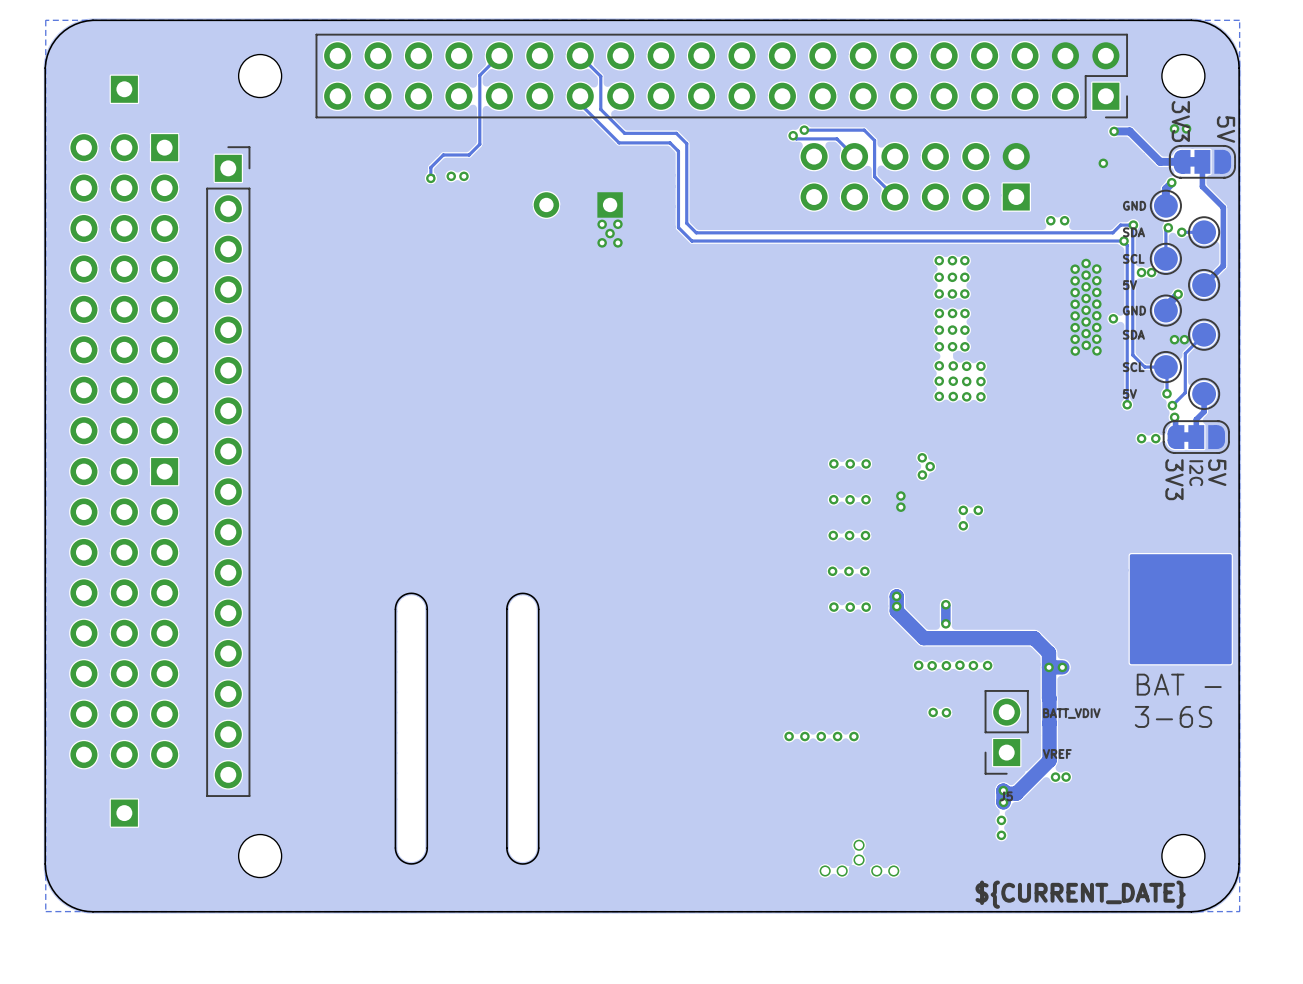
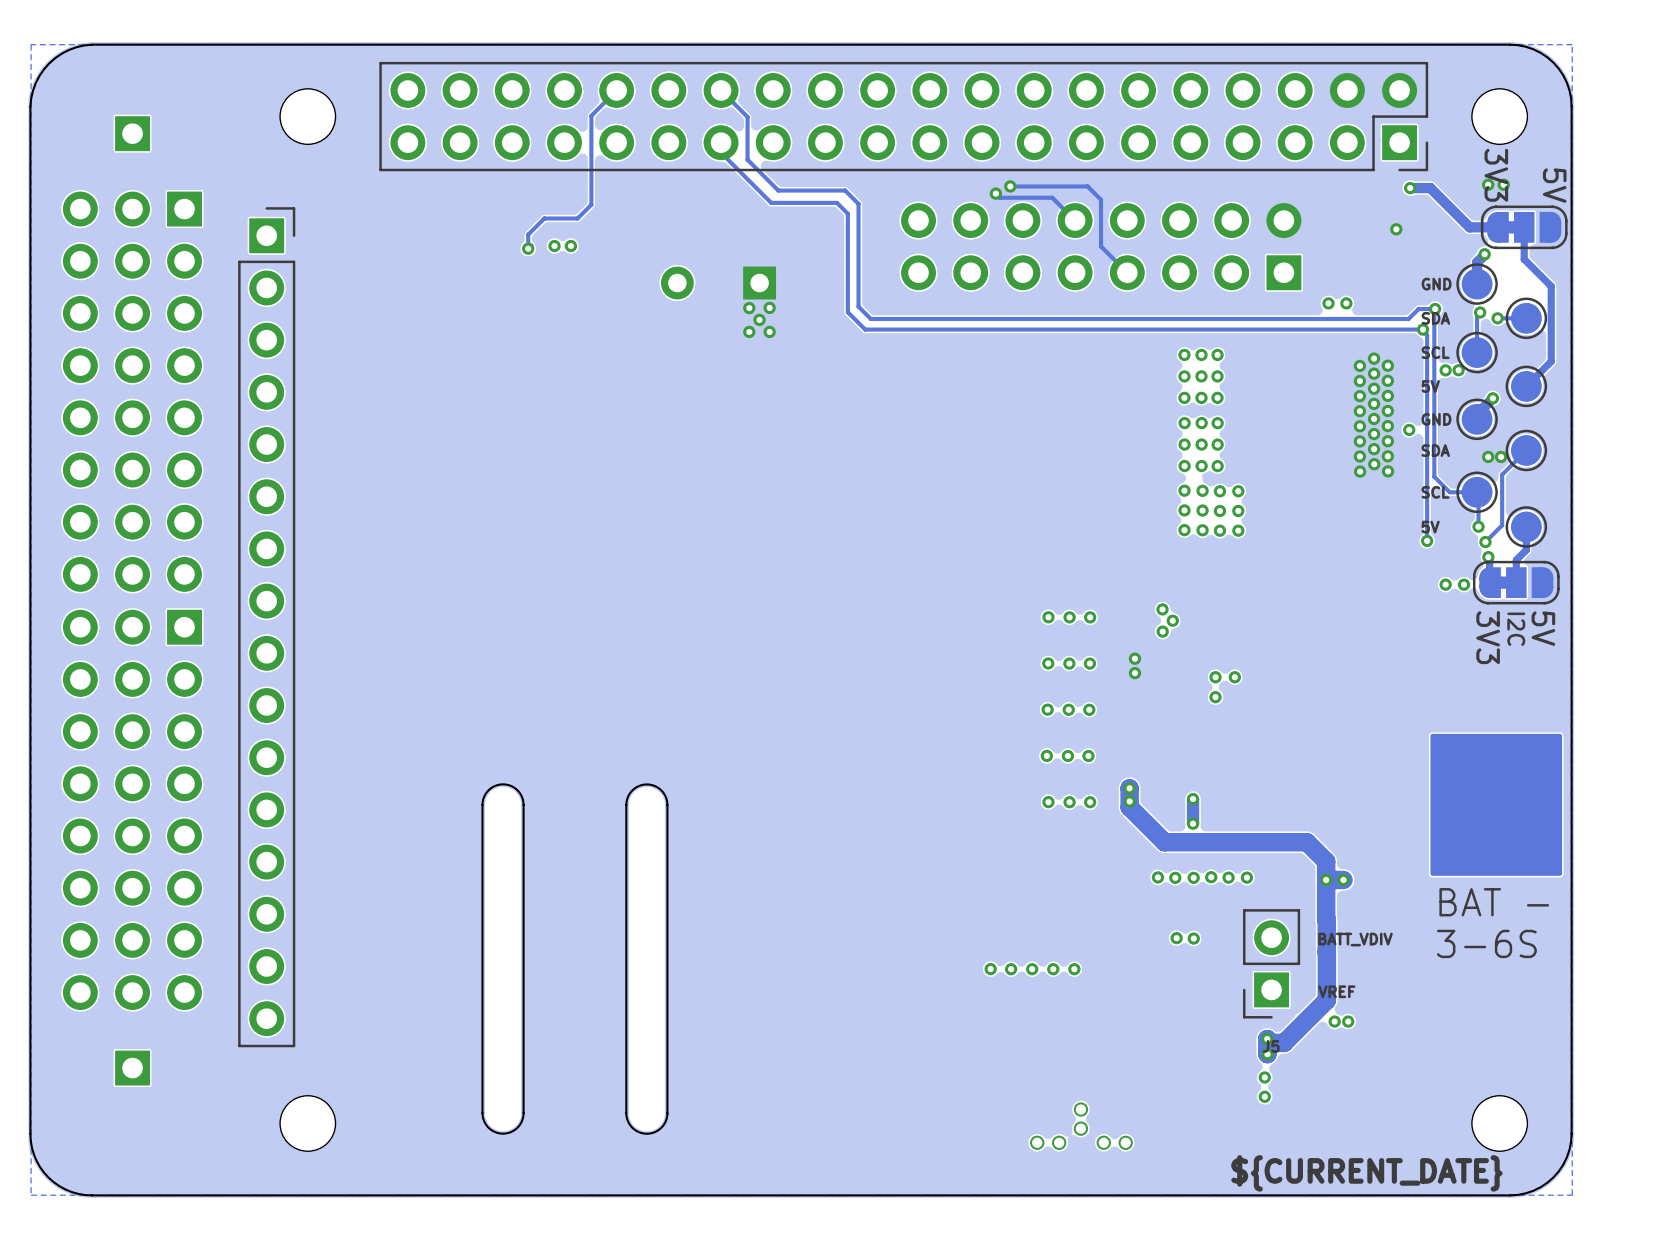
part: none -> (1101, 246)
part: (915, 176) -> none

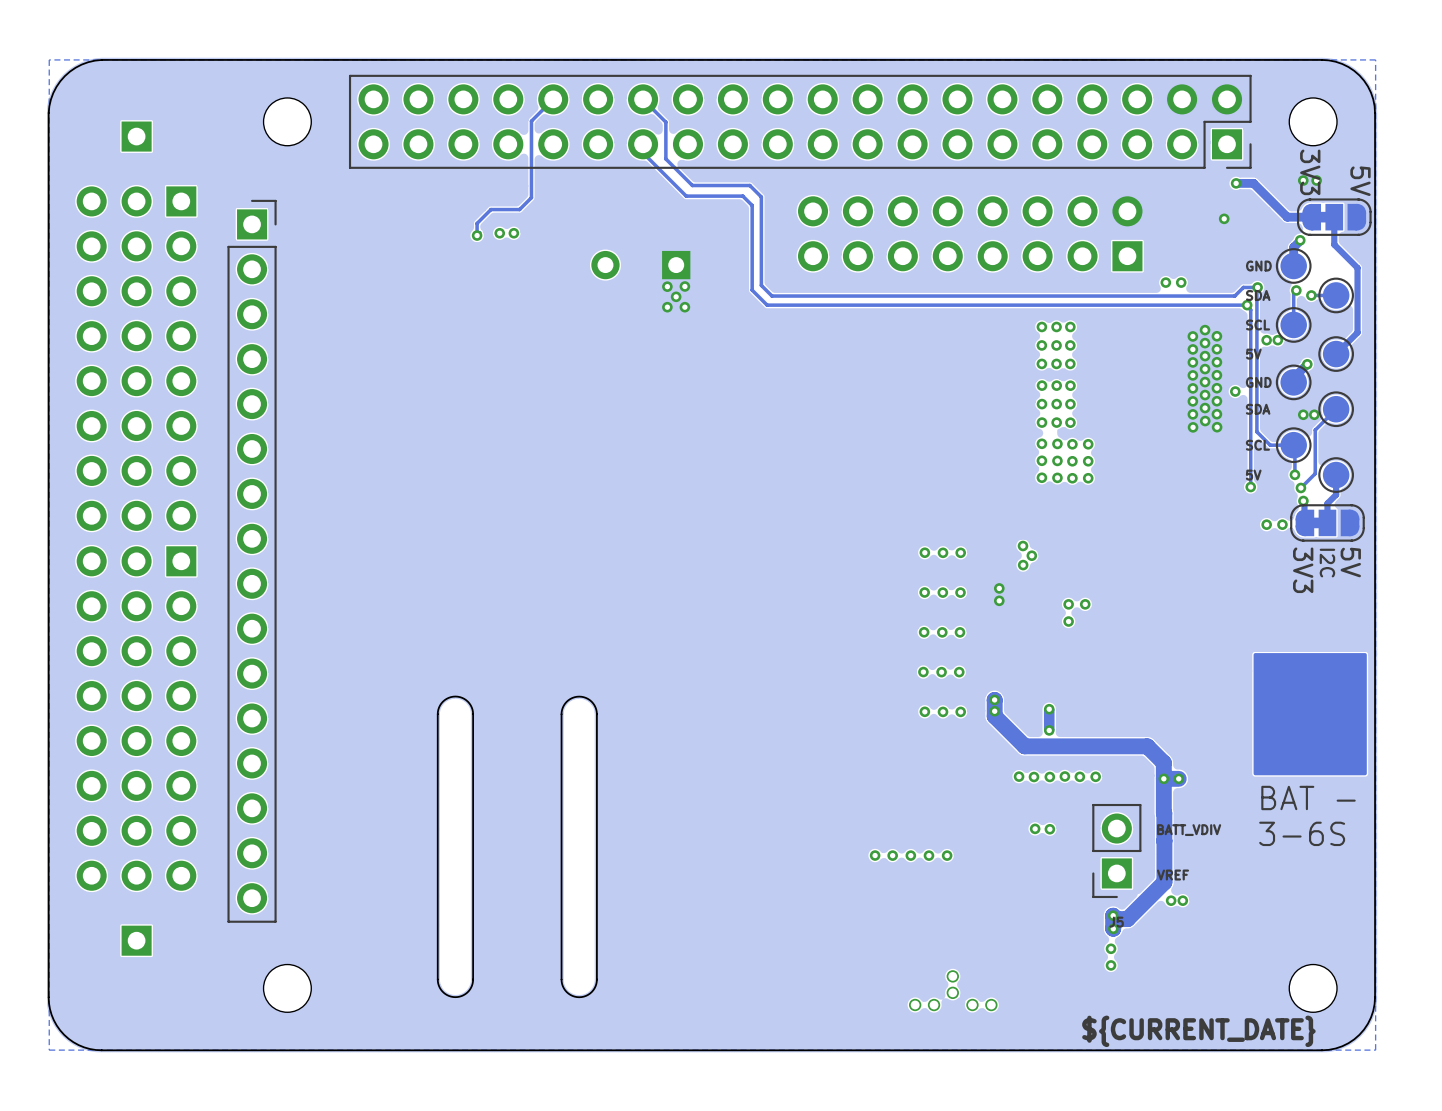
track: (1010, 186) (1087, 186) (1101, 199) (1101, 246) (1127, 272) -> none
via: (1010, 186) -> none
track: (995, 193) (999, 197) (1052, 197) (1075, 220) -> none
via: (995, 193) -> none

